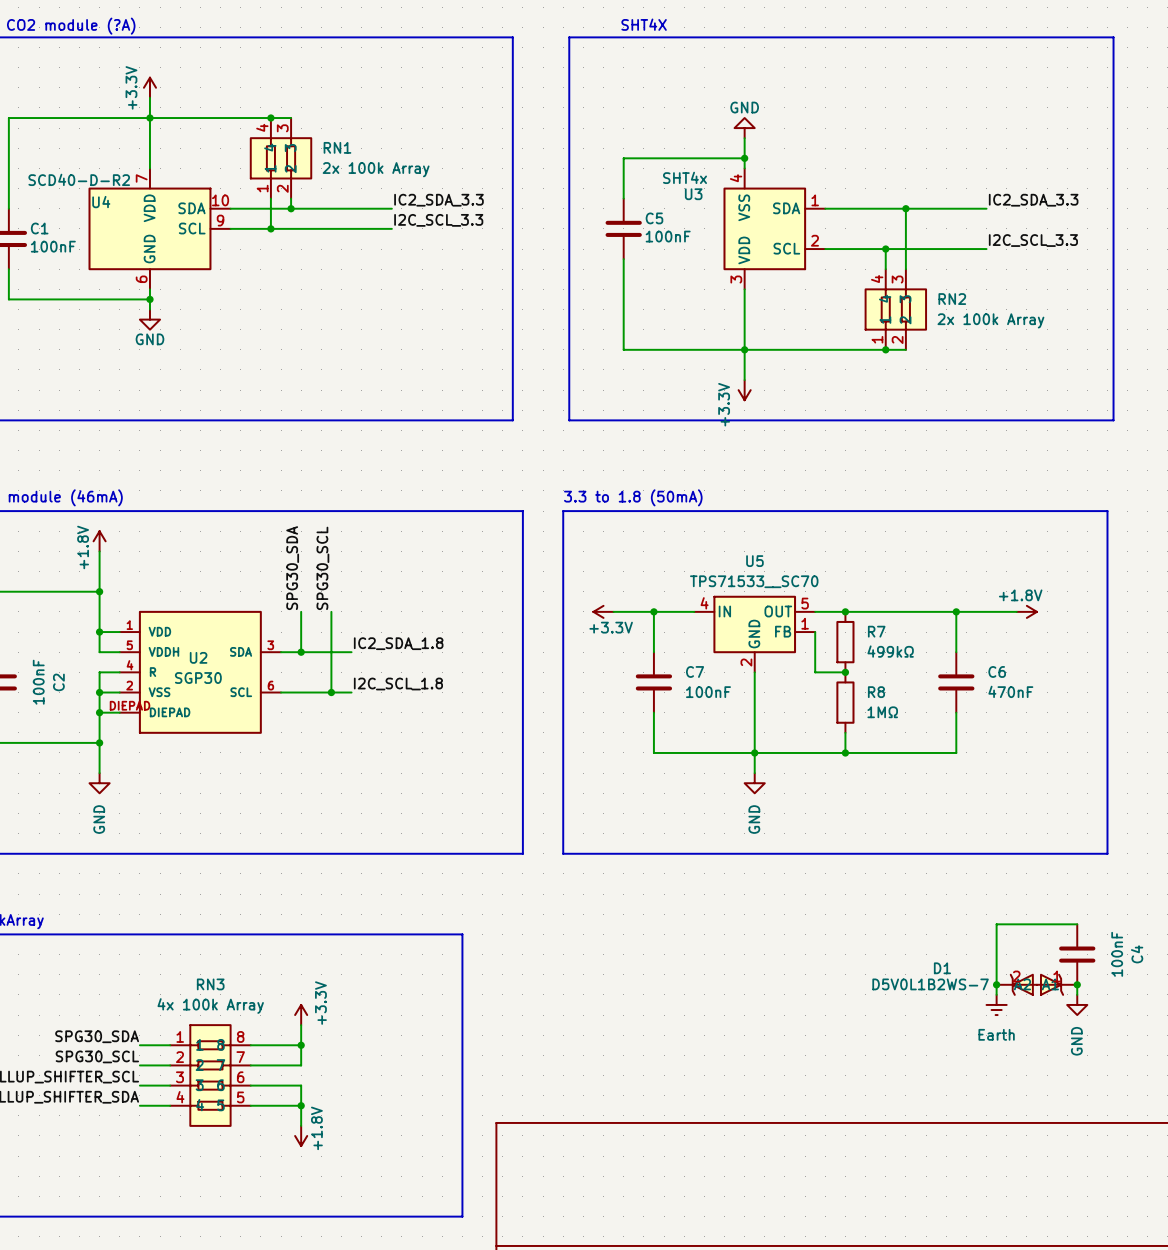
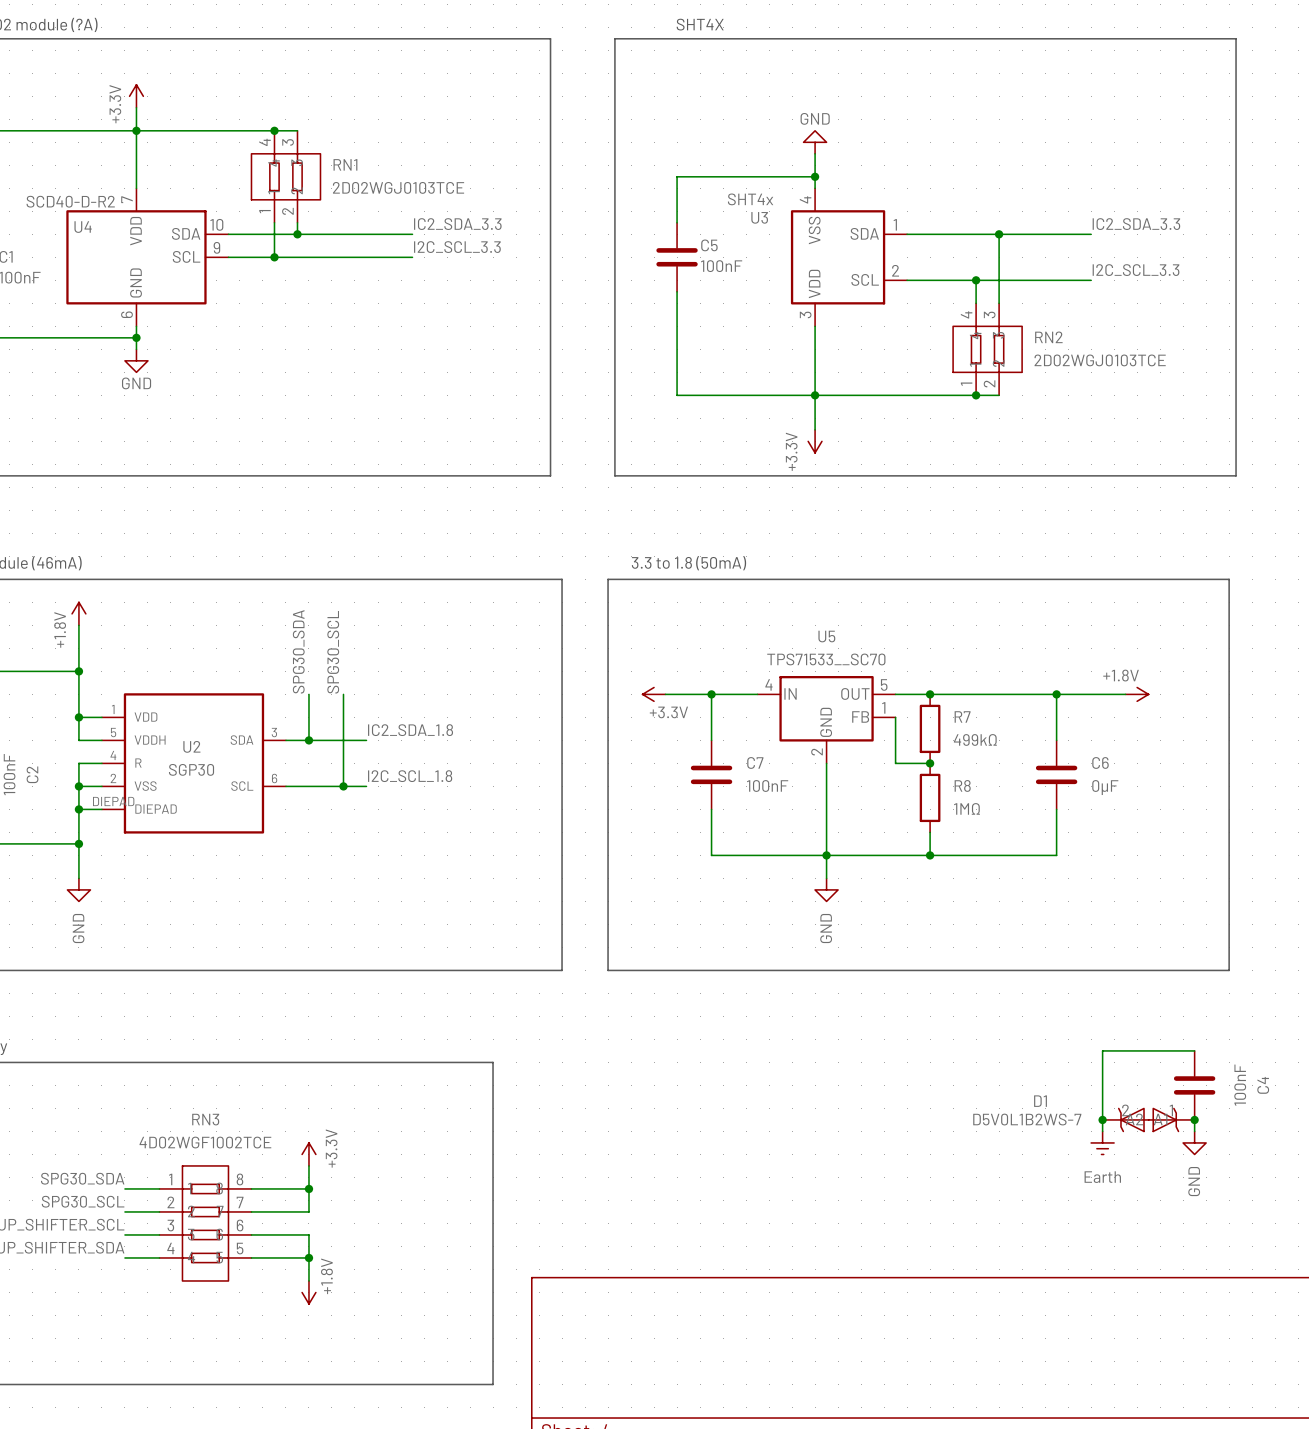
RN1 value: 2x 100k Array (376, 169) -> 2D02WGJ0103TCE (398, 187)
RN2 value: 2x 100k Array (990, 320) -> 2D02WGJ0103TCE (1100, 360)
C6 value: 470nF (1010, 691) -> 0μF (1105, 787)
RN3 value: 4x 100k Array (210, 1006) -> 4D02WGF1002TCE (205, 1142)

